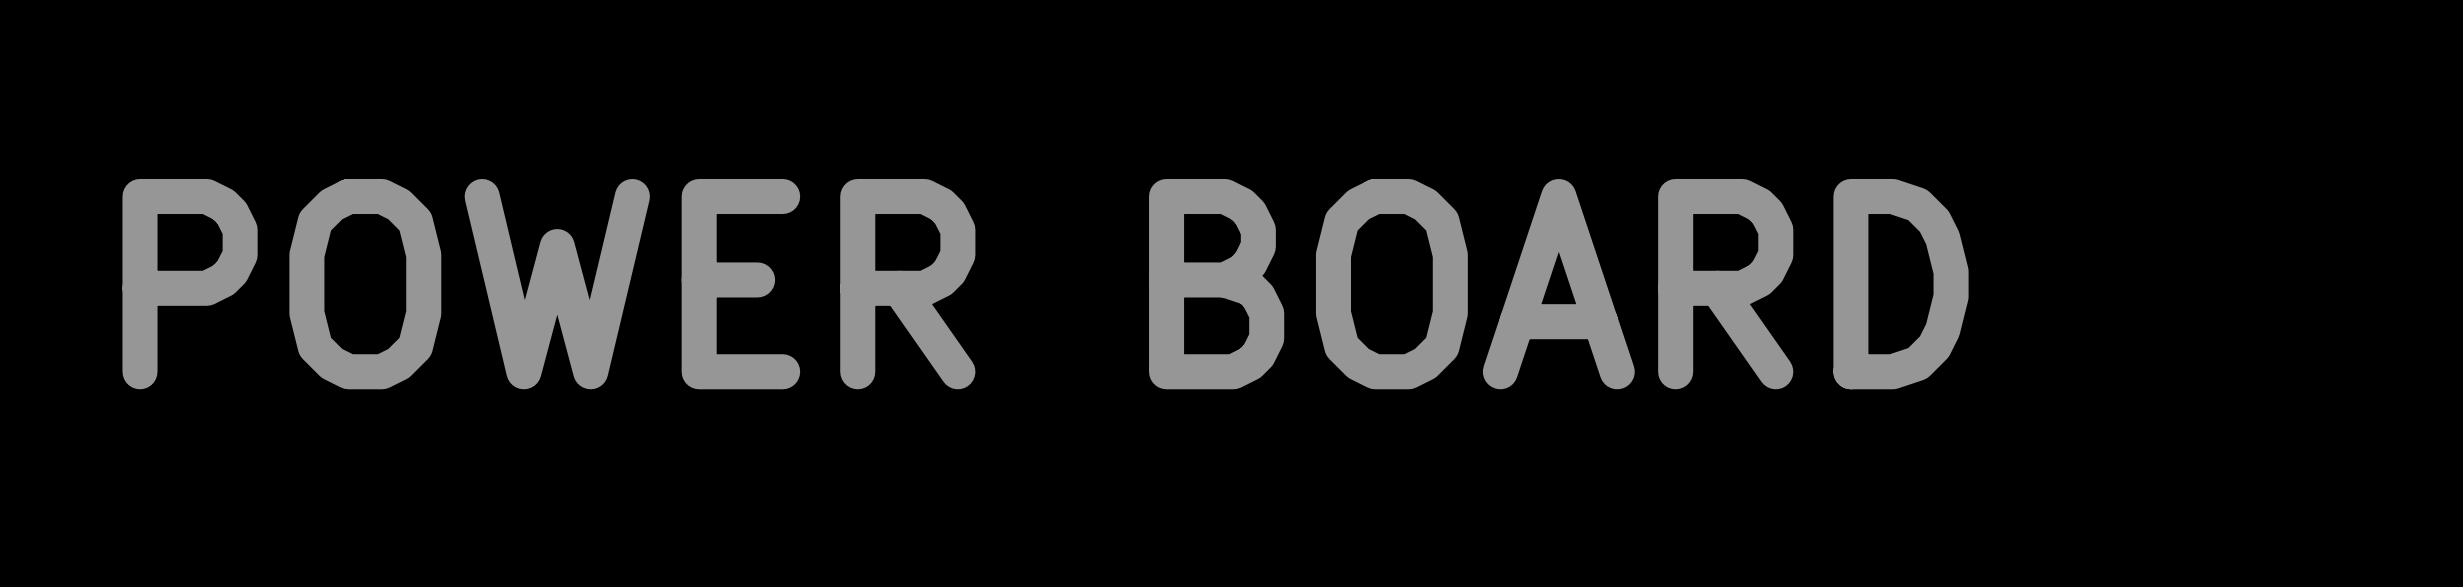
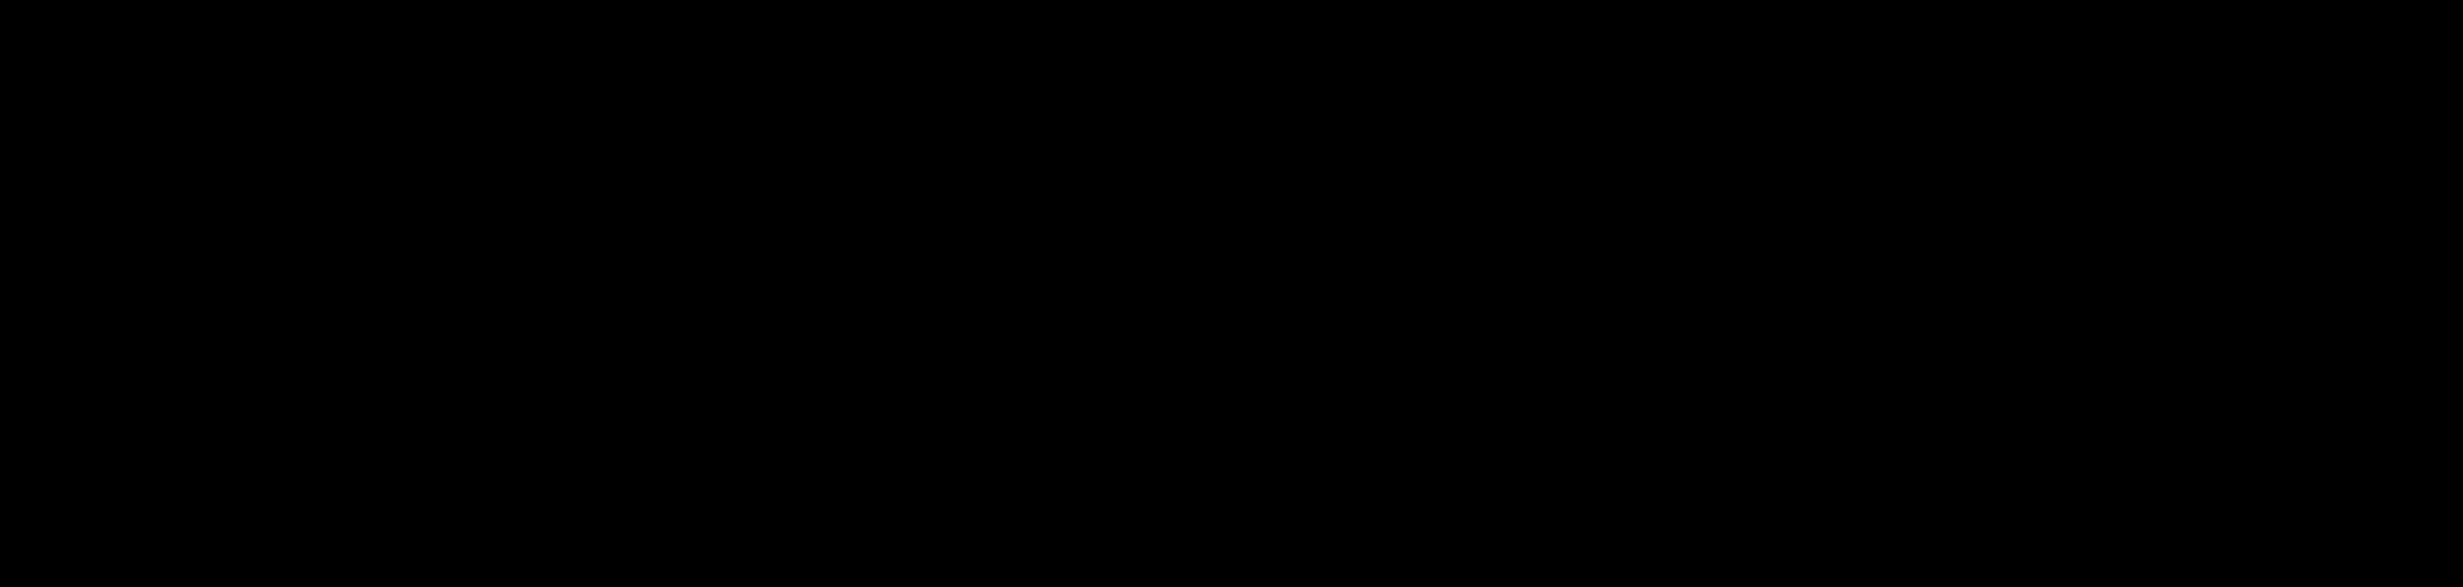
text: POWER BOARD (1045, 284) -> none

